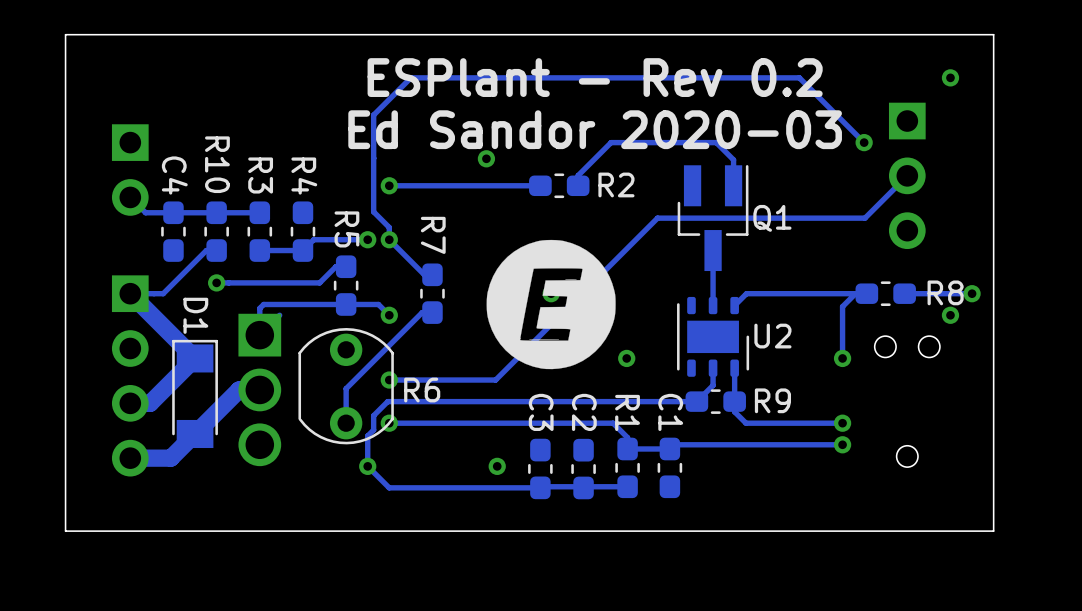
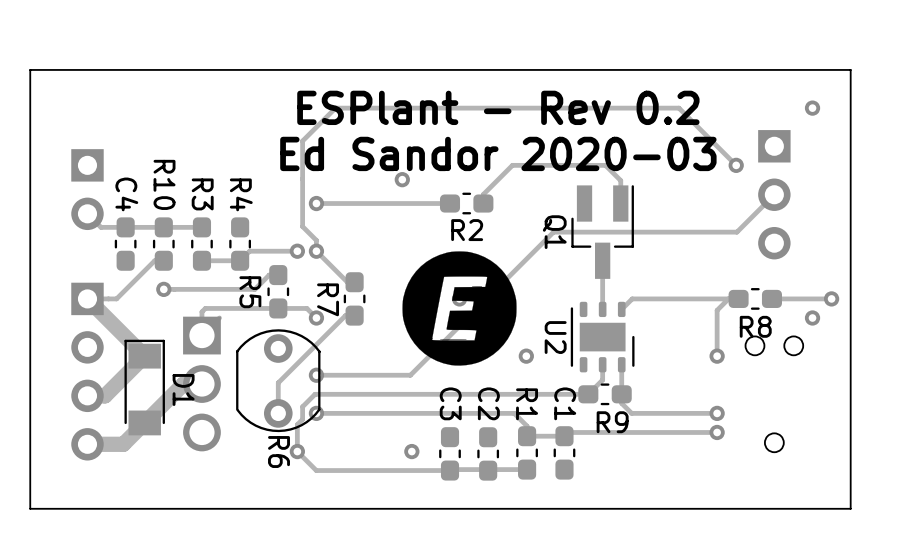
R2 name position: R2 (616, 184) -> R2 (467, 230)
Q1 name rotation: 0° (772, 218) -> 90° clockwise (554, 232)
Q1 name position: Q1 (772, 218) -> Q1 (554, 232)
R5 name position: R5 (346, 229) -> R5 (250, 292)
R7 name position: R7 (433, 235) -> R7 (328, 299)
R8 name position: R8 (945, 292) -> R8 (755, 326)
D1 name position: D1 (195, 315) -> D1 (183, 390)
U2 name rotation: 0° (772, 336) -> 90° clockwise (555, 337)
U2 name position: U2 (772, 336) -> U2 (555, 337)
R6 name rotation: 0° (422, 390) -> 90° clockwise (279, 452)
R6 name position: R6 (422, 390) -> R6 (279, 452)
R9 name position: R9 (772, 400) -> R9 (612, 422)

